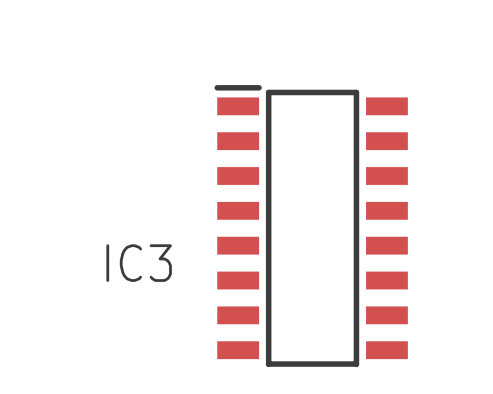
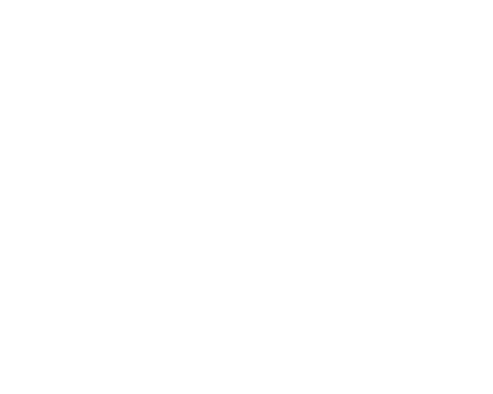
IC3: (311, 225) -> none

